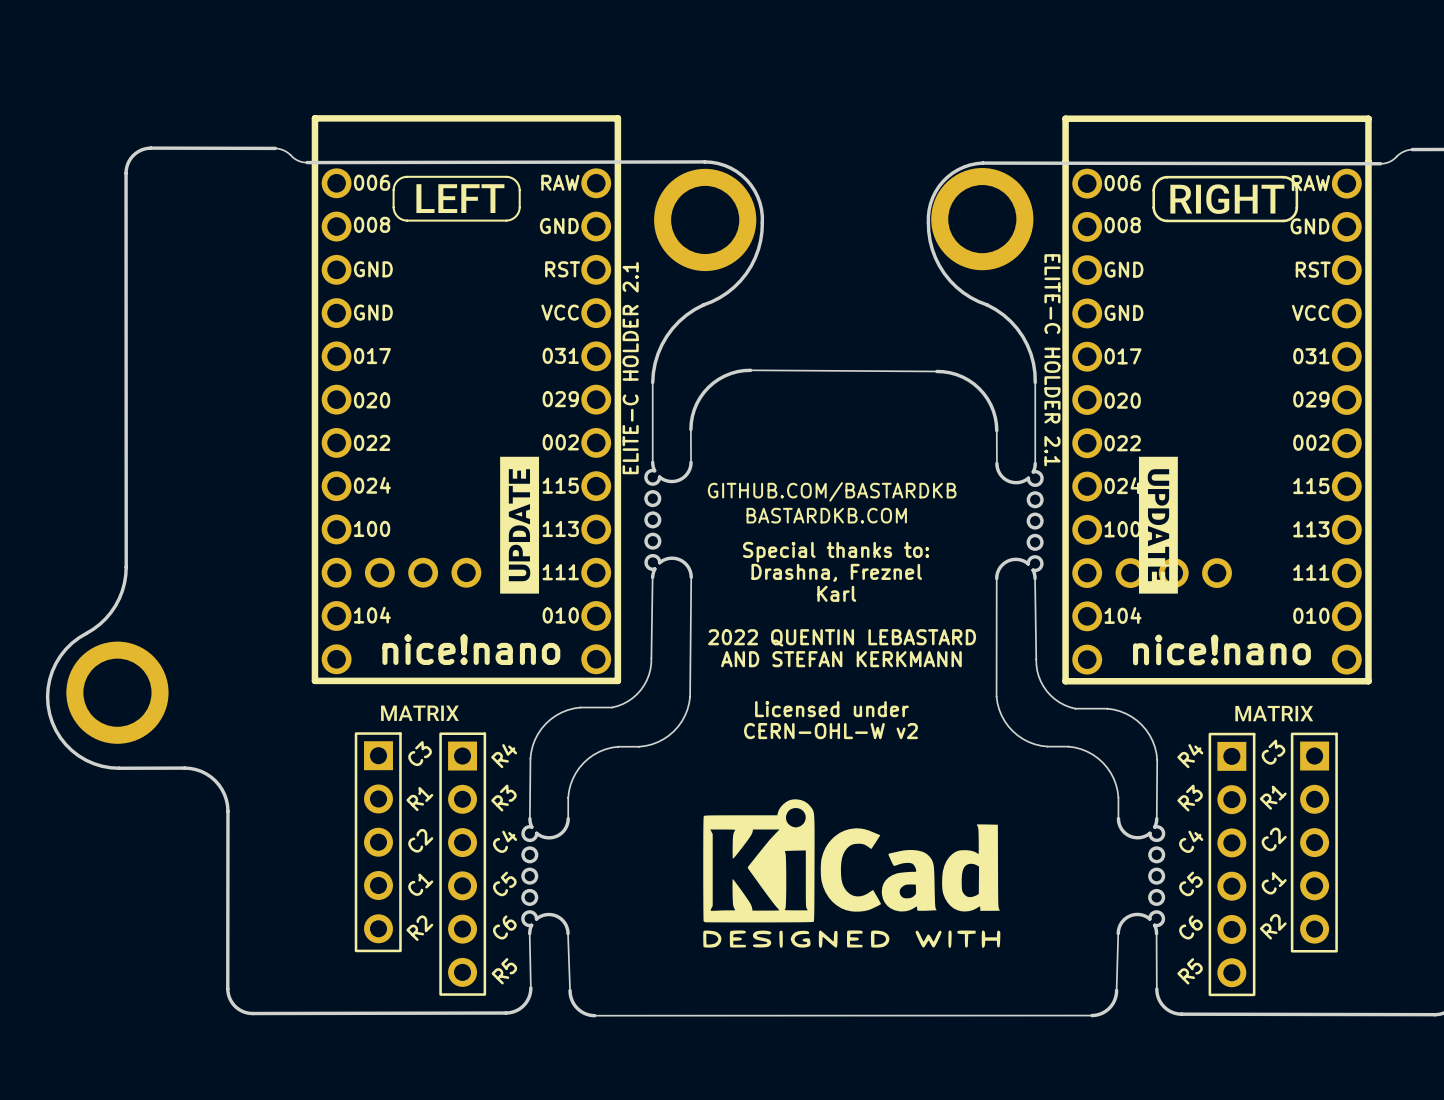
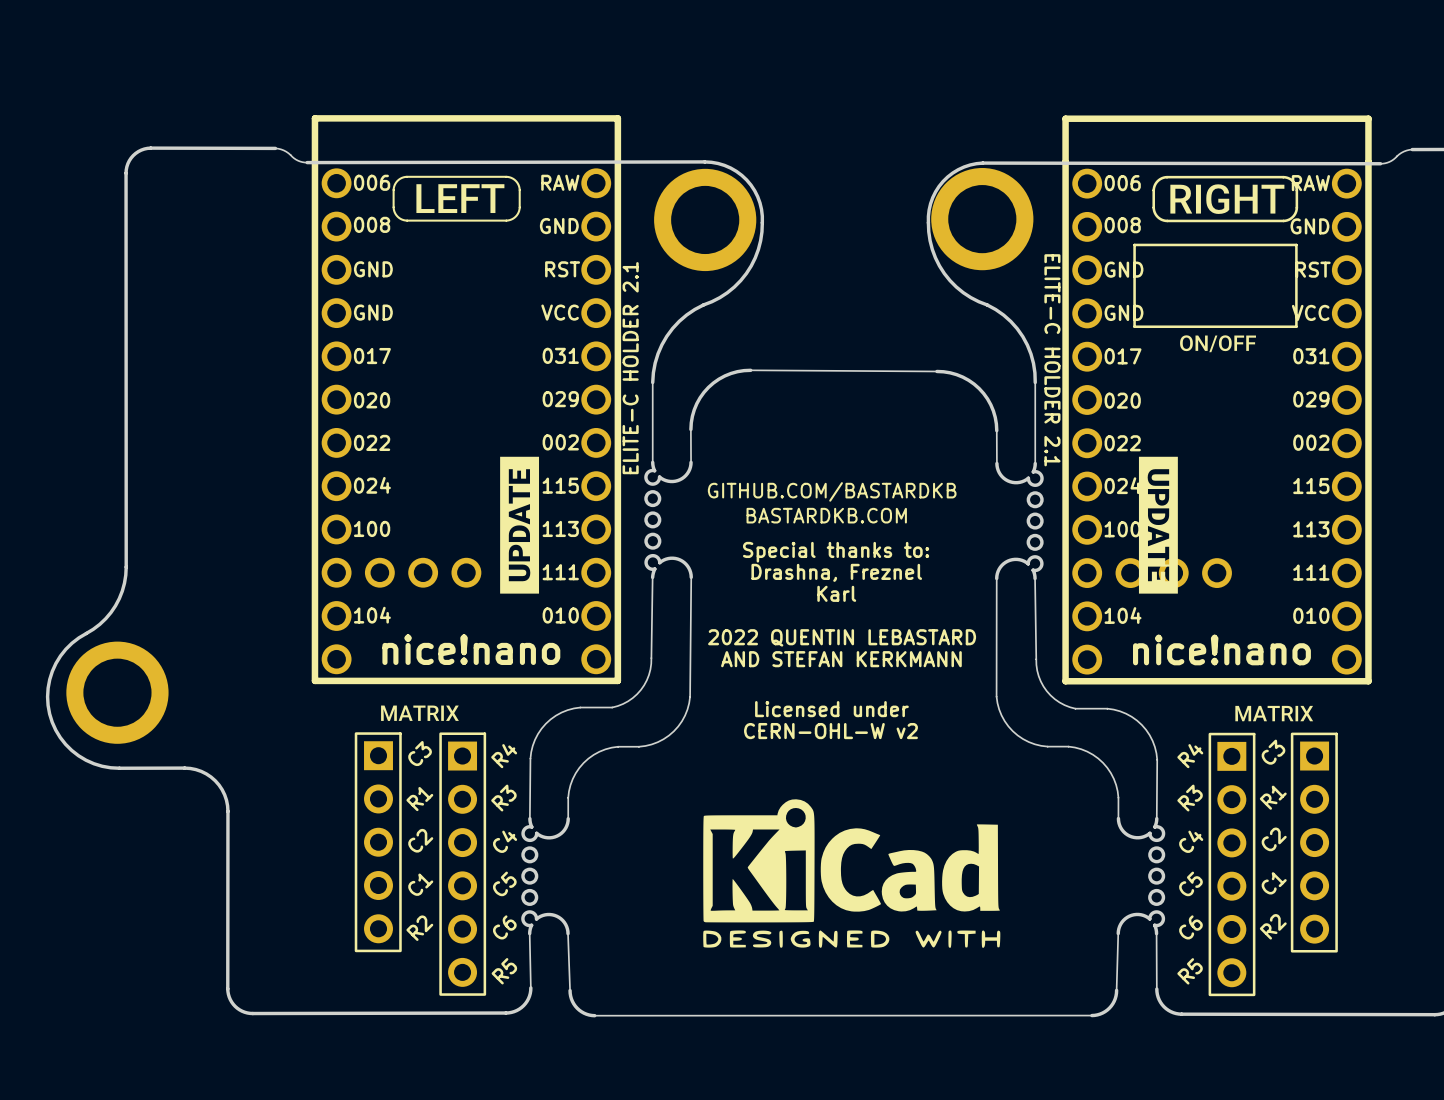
line: none -> (1296, 244) (1134, 244) (1134, 326) (1296, 326) (1296, 244)
drawing: none -> [1180, 335, 1257, 353]

